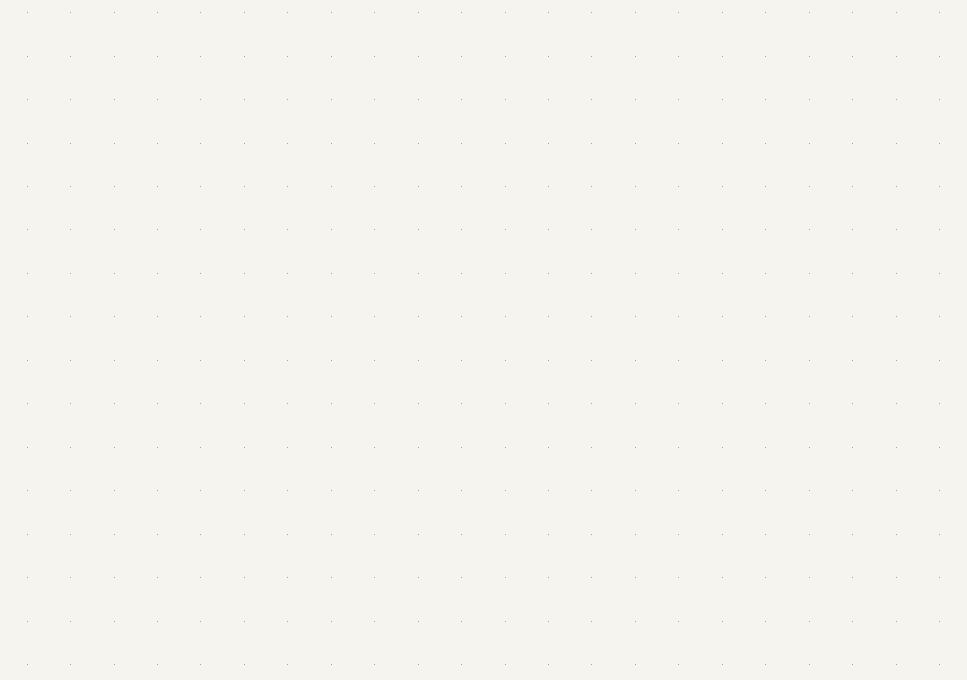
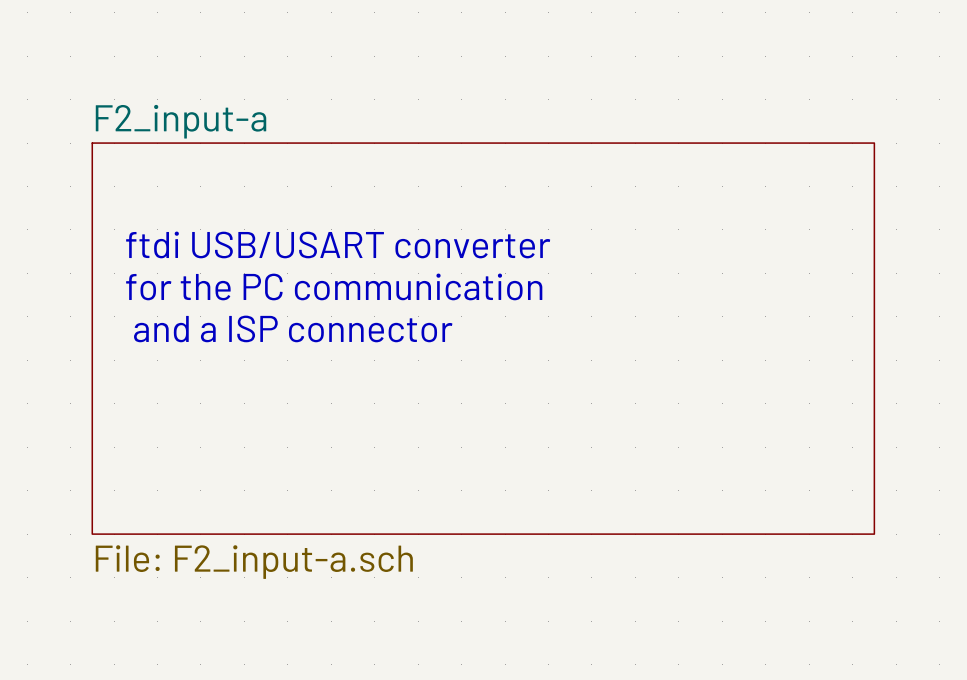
text: none -> ftdi USB/USART converter (338, 244)
text: none -> for the PC communication (334, 286)
text: none -> and a ISP connector (293, 328)
sheet F2_input-a: none -> File: F2_input-a.sch (483, 338)

